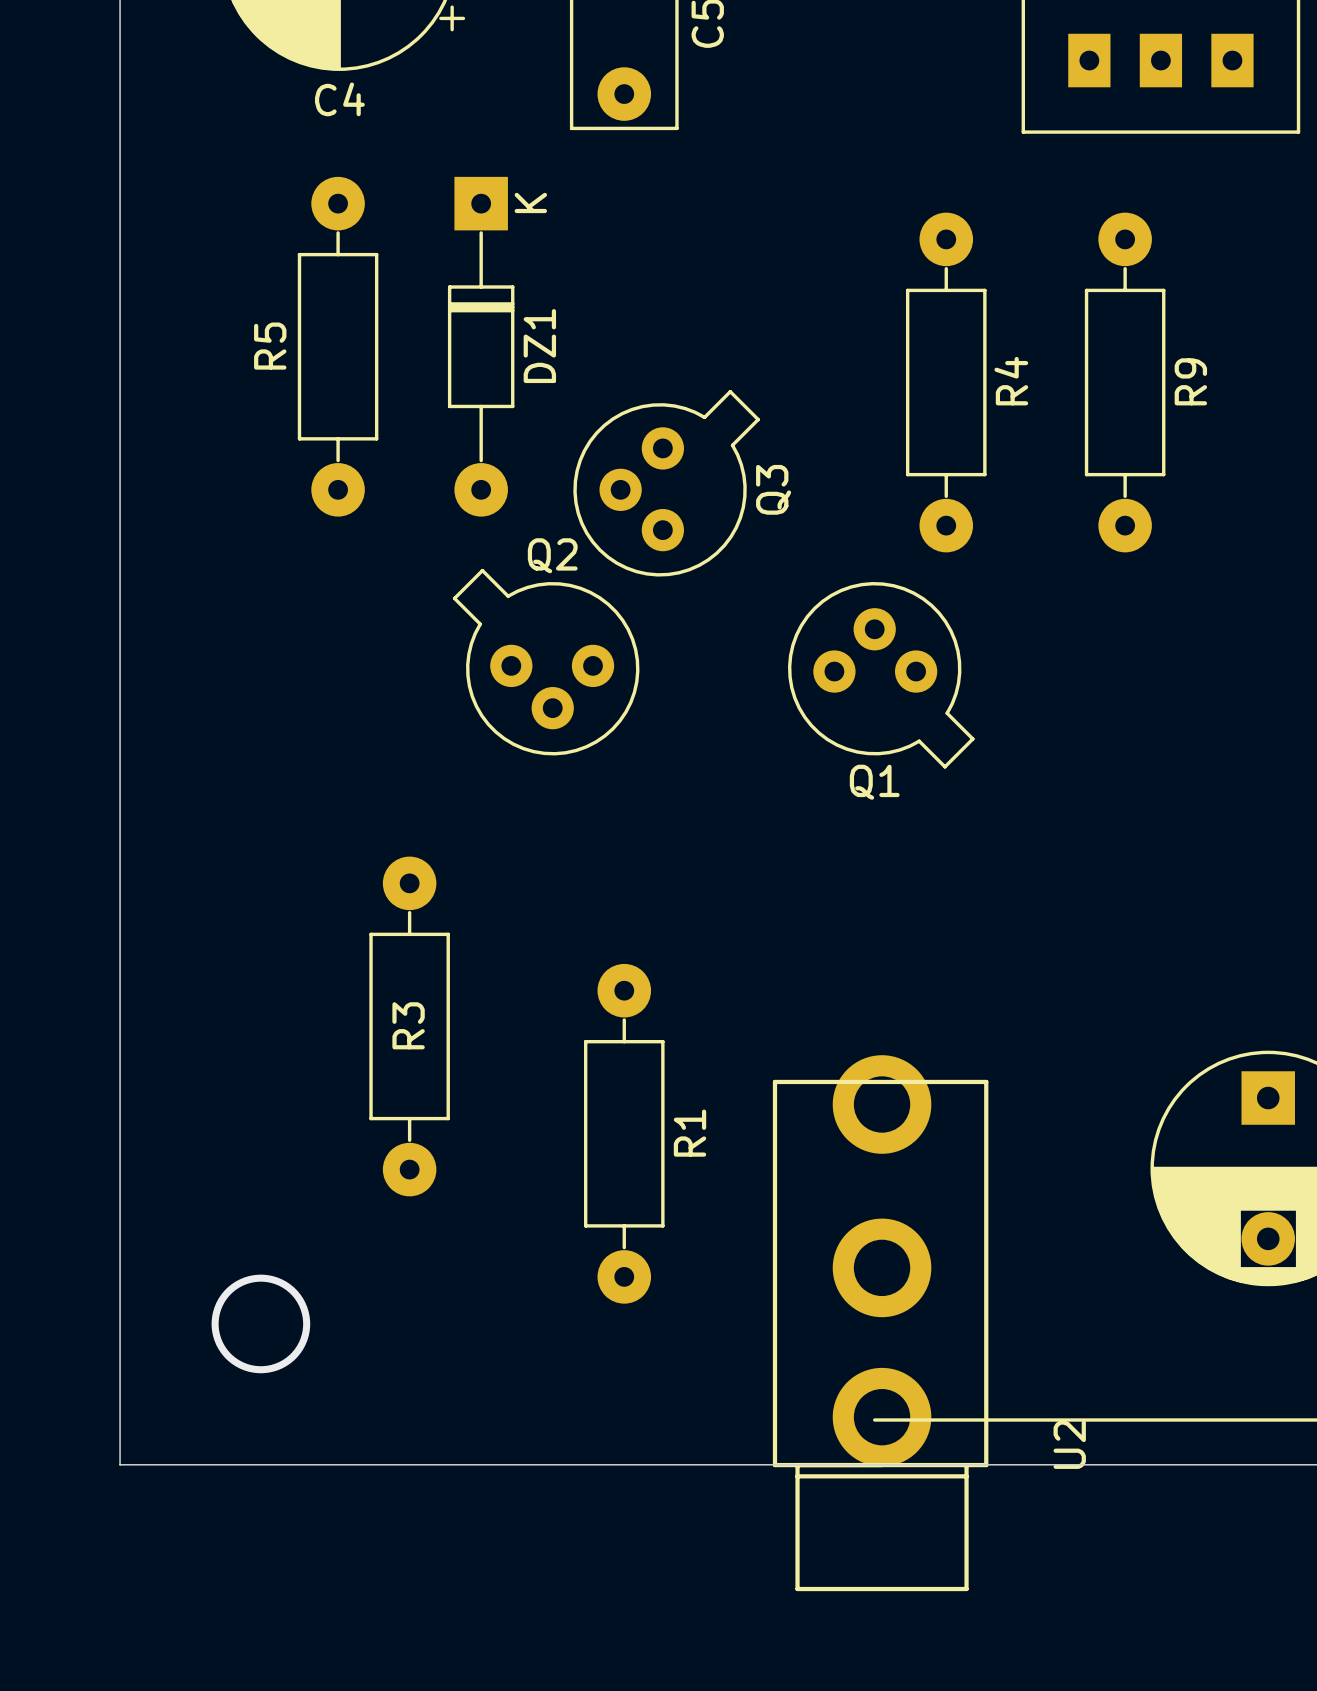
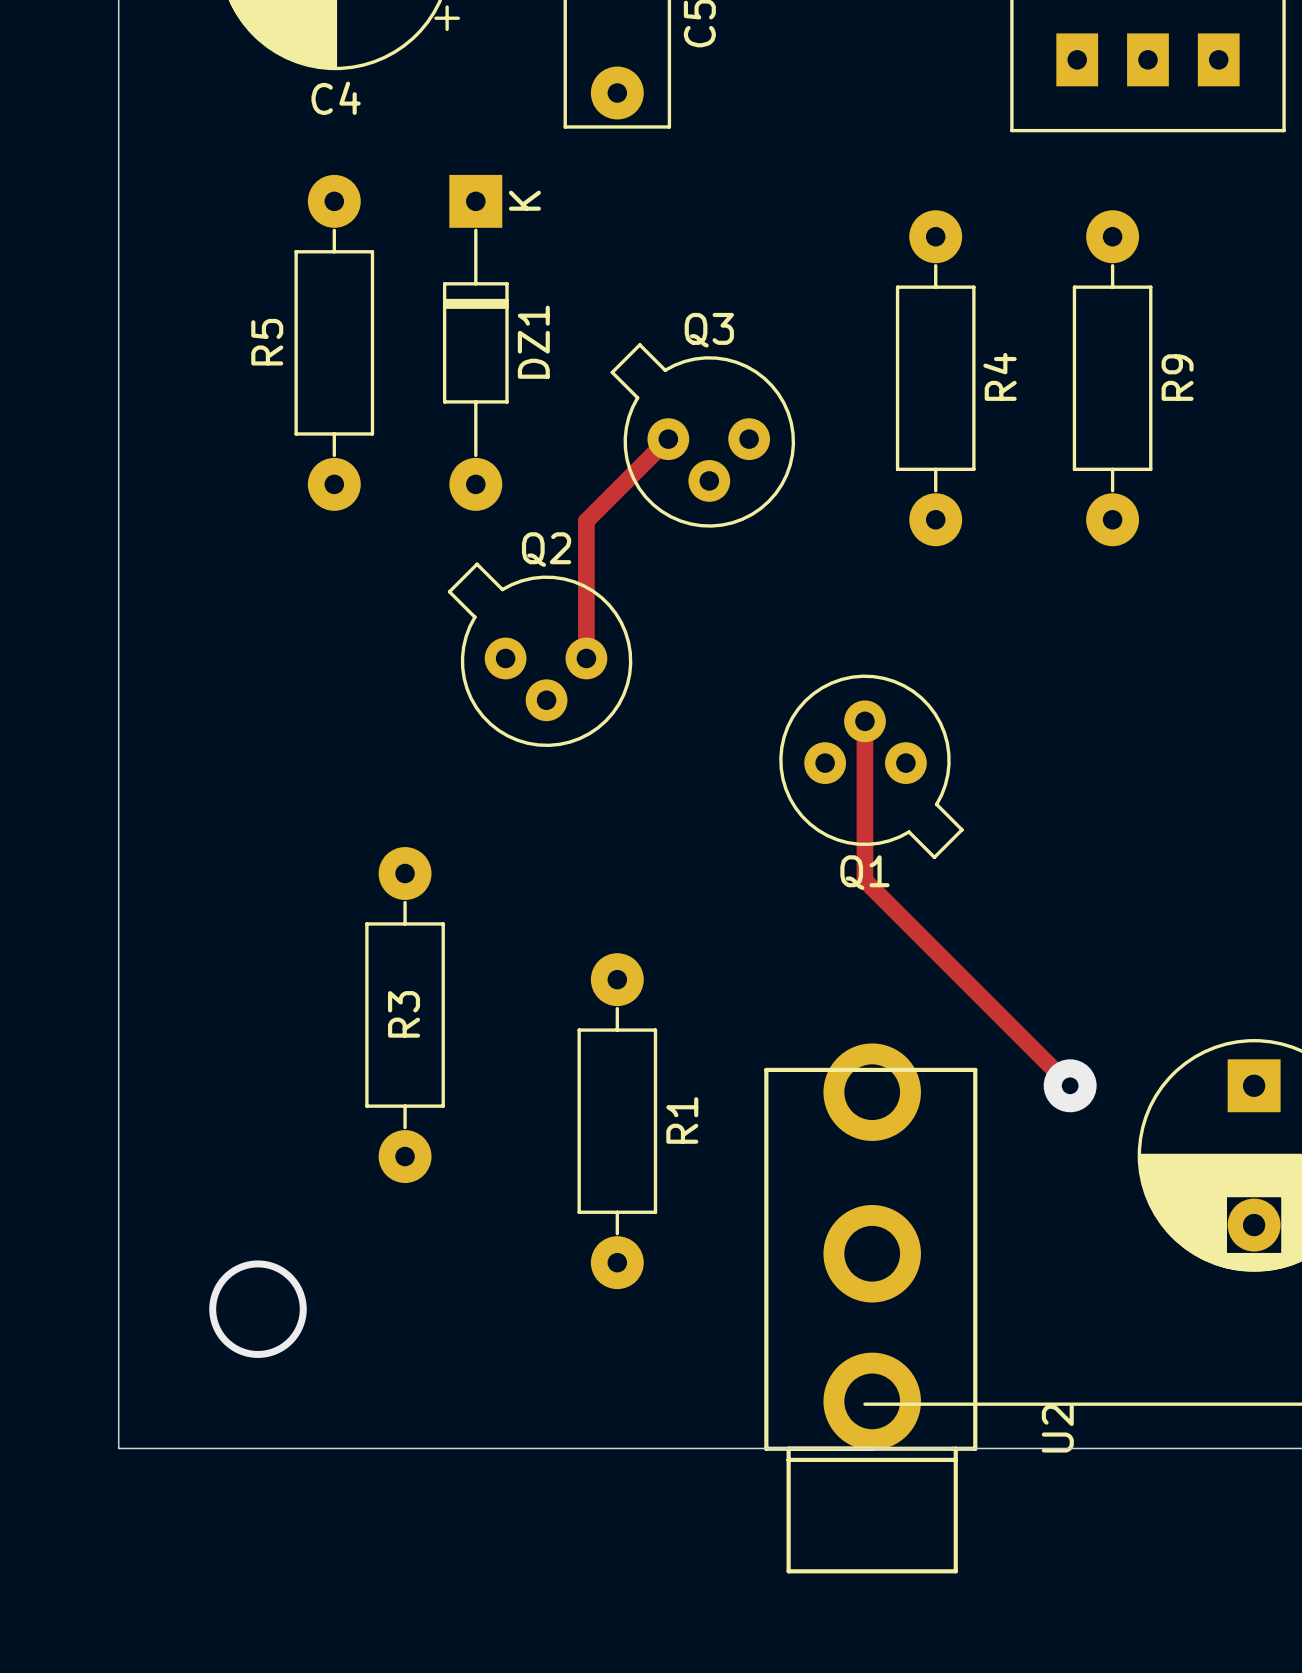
track: none -> (668, 439) (586, 521) (586, 658)
Q3 rotation: 0° (666, 483) -> 90° counterclockwise (702, 435)
Q1 position: (881, 675) -> (871, 766)
track: none -> (864, 721) (864, 880) (1070, 1085)
via: none -> (1070, 1085)

